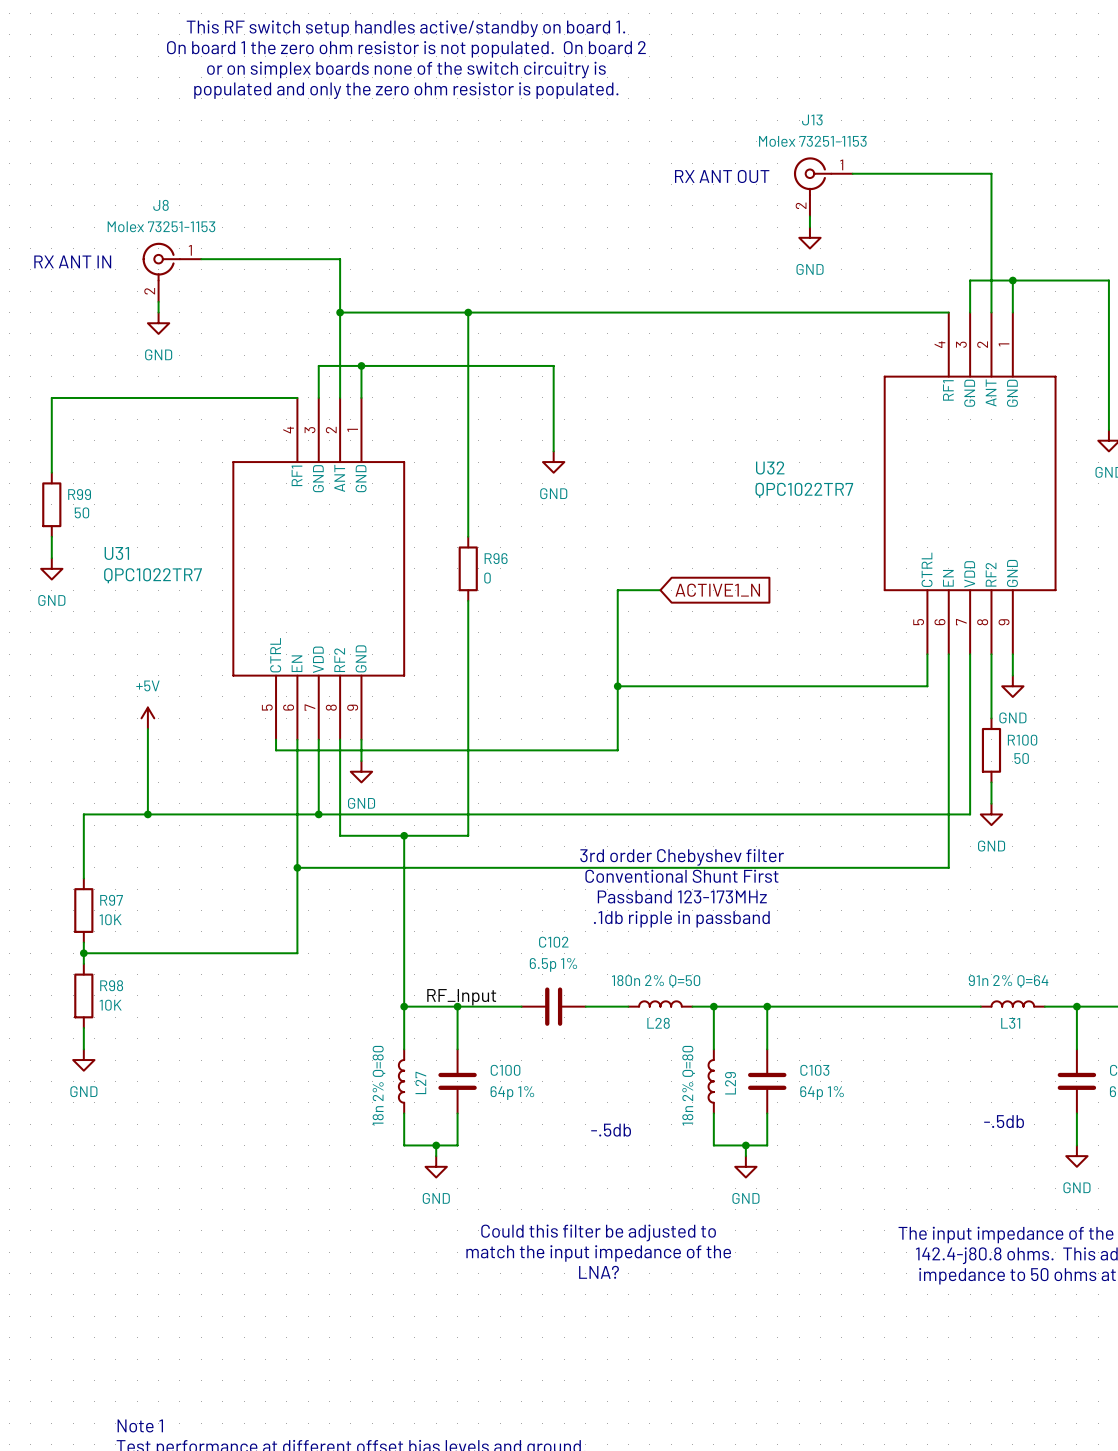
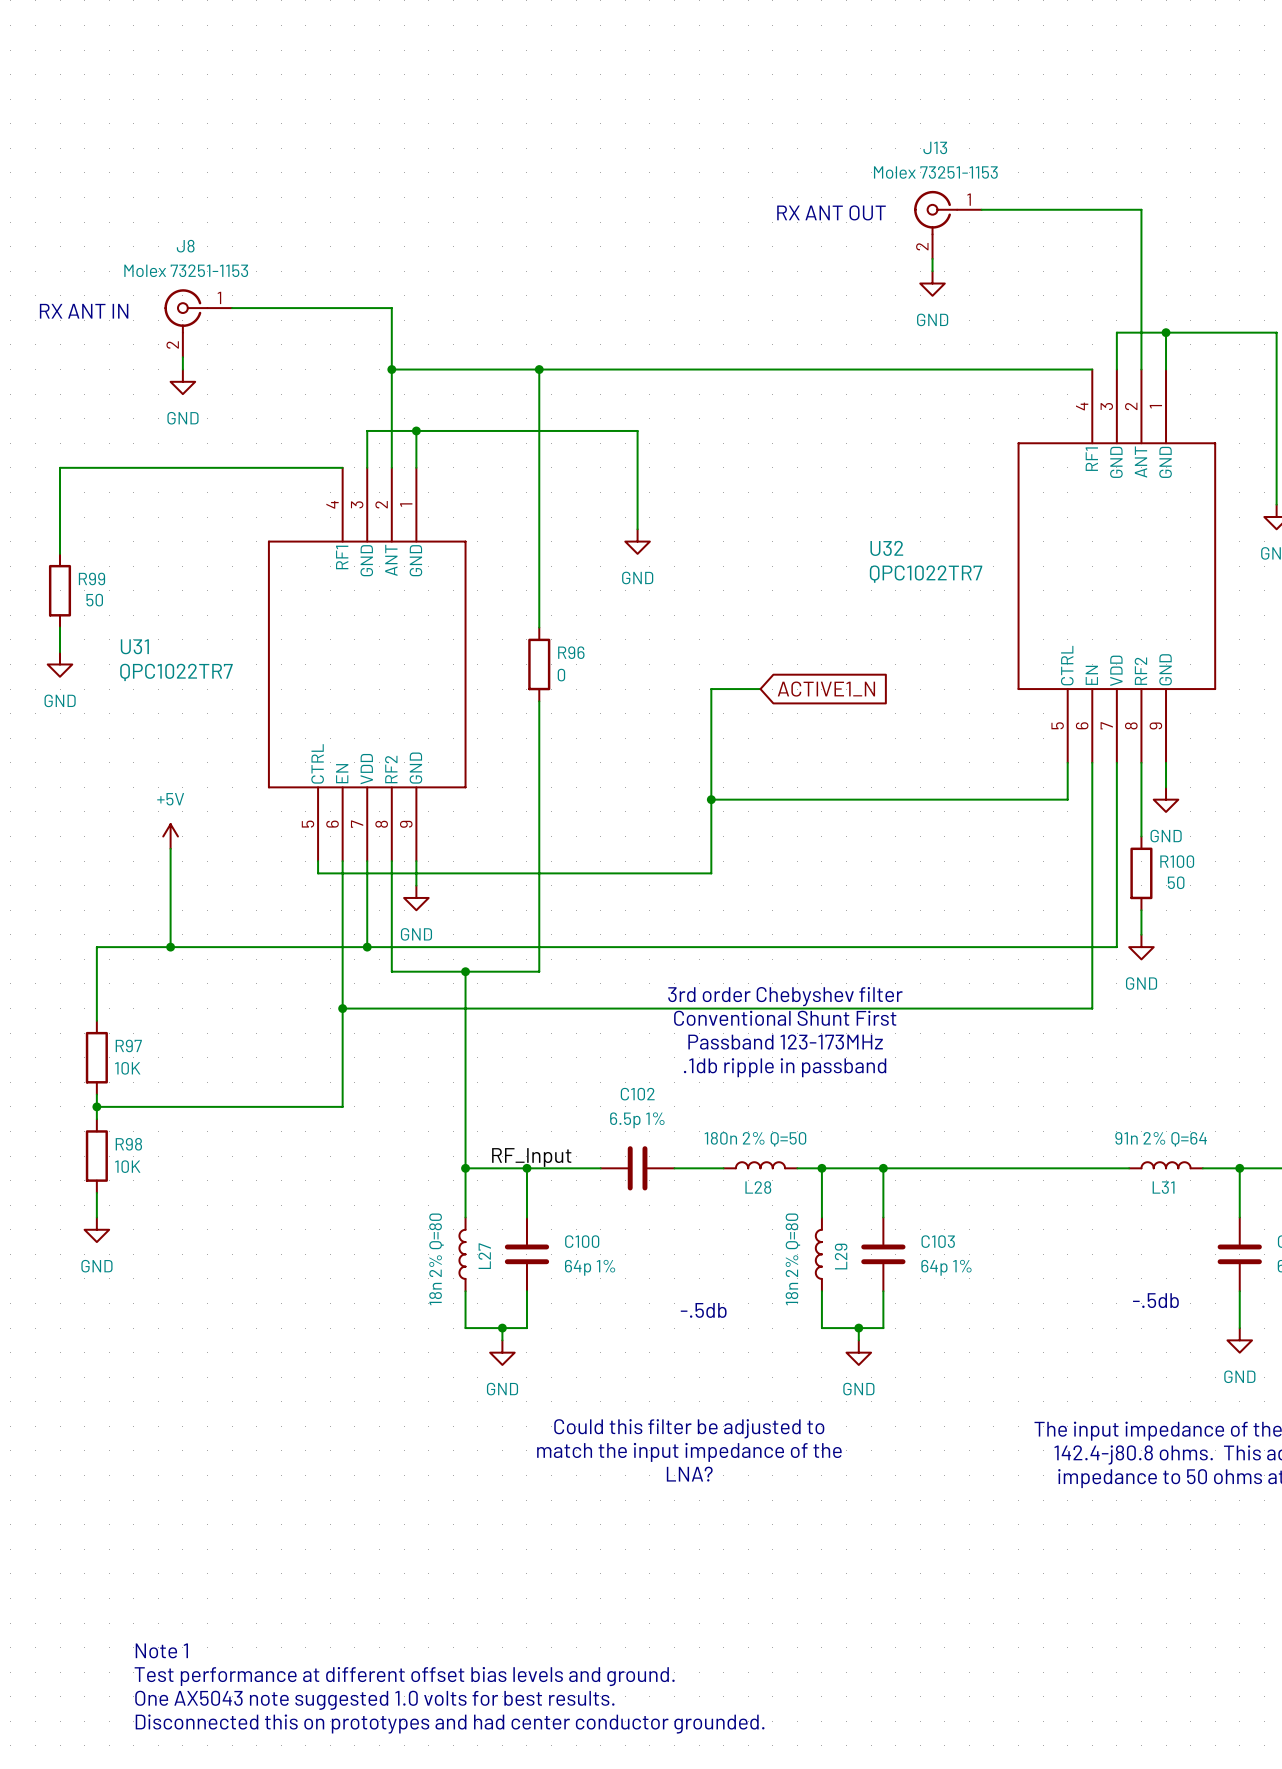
text: This RF switch setup handles active/standby on board 1. (405, 28) -> none
text: On board 1 the zero ohm resistor is not populated. On board 2 (406, 49) -> none
text: or on simplex boards none of the switch circuitry is (406, 70) -> none
text: populated and only the zero ohm resistor is populated. (406, 90) -> none

